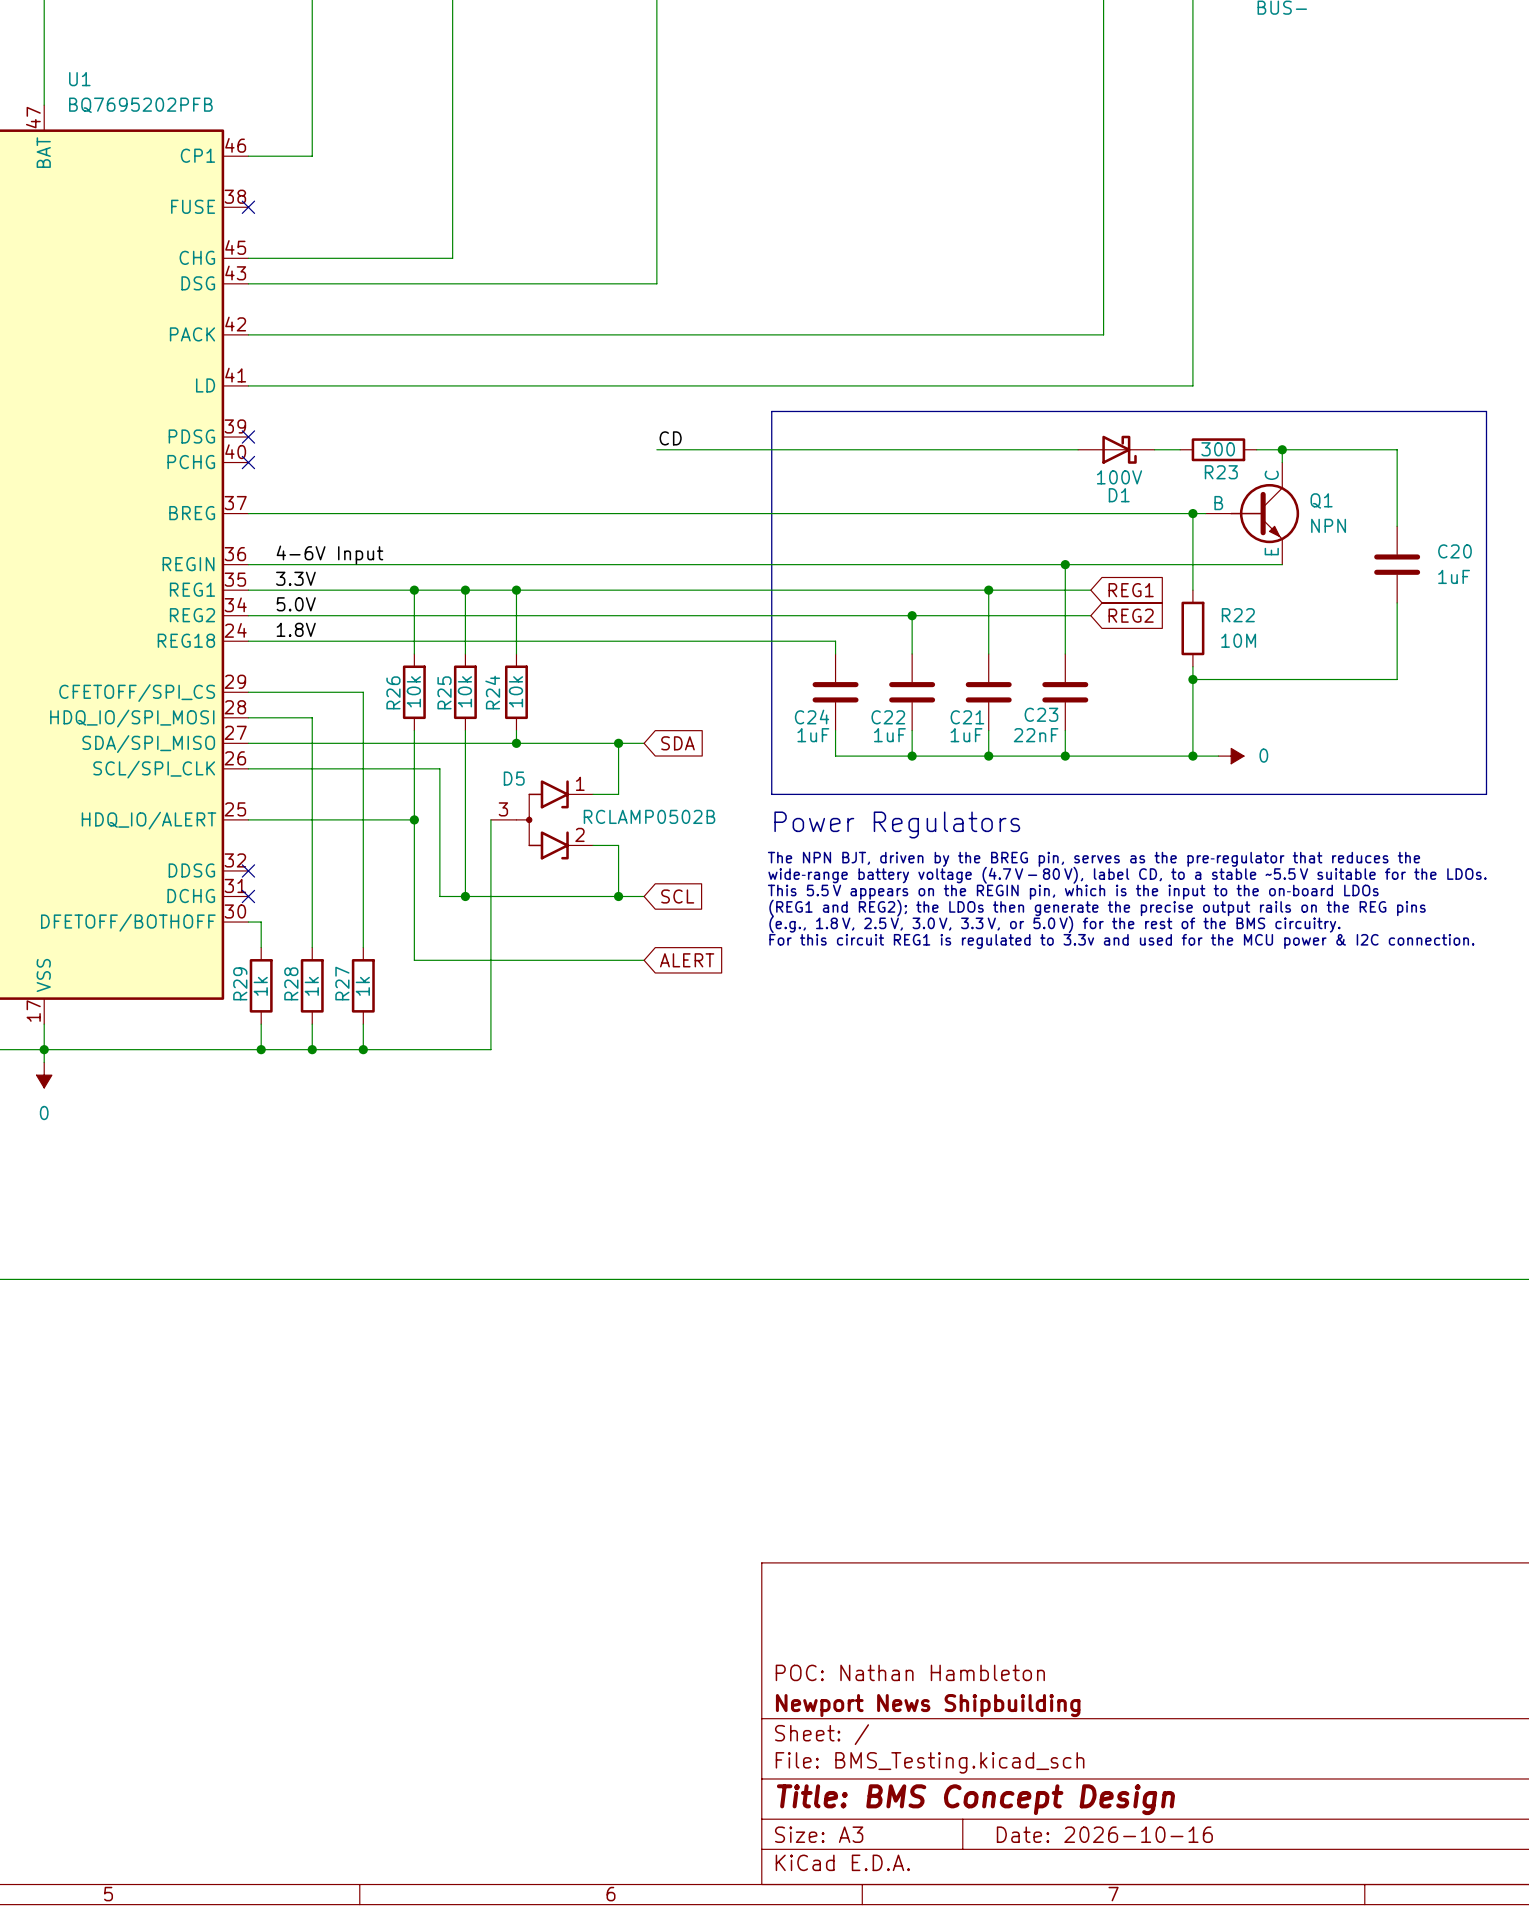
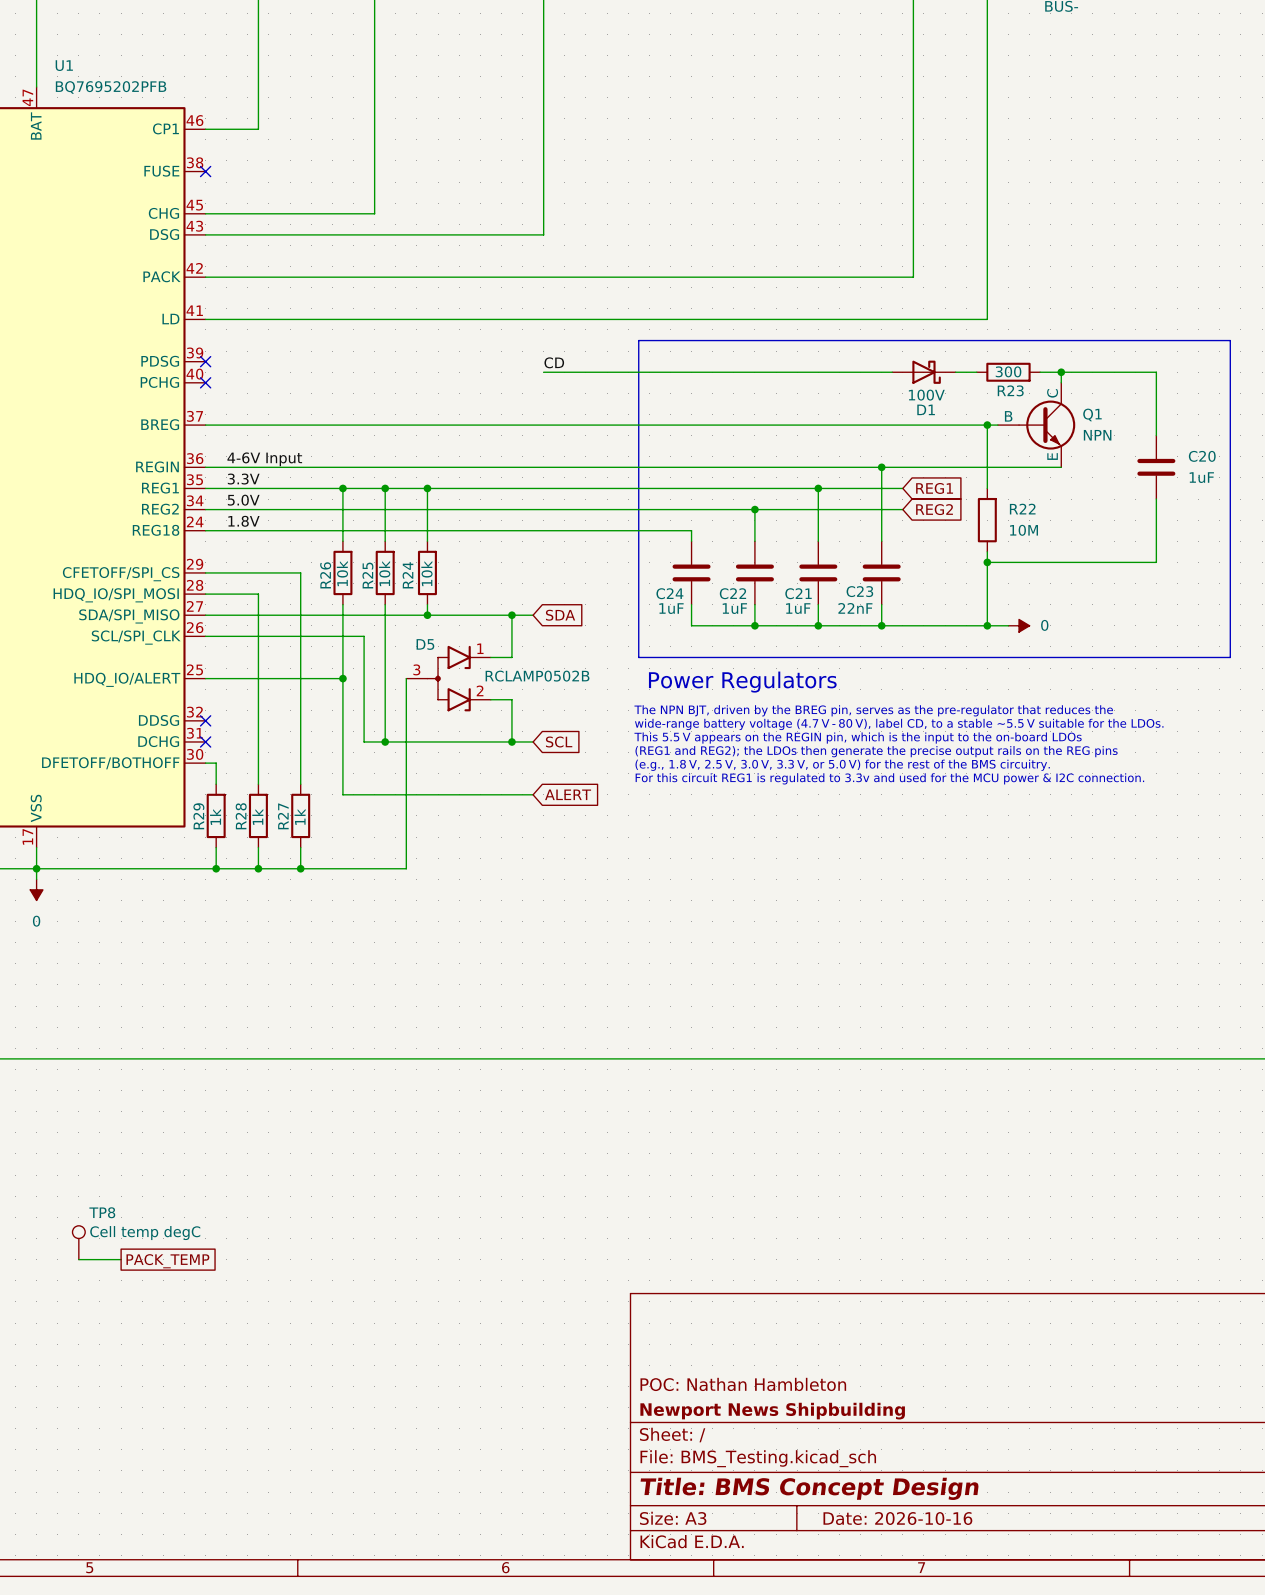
TP8: none -> Cell temp degC (78, 1242)
wire: none -> (78, 1259) (121, 1259)
global label: none -> PACK_TEMP (167, 1261)

